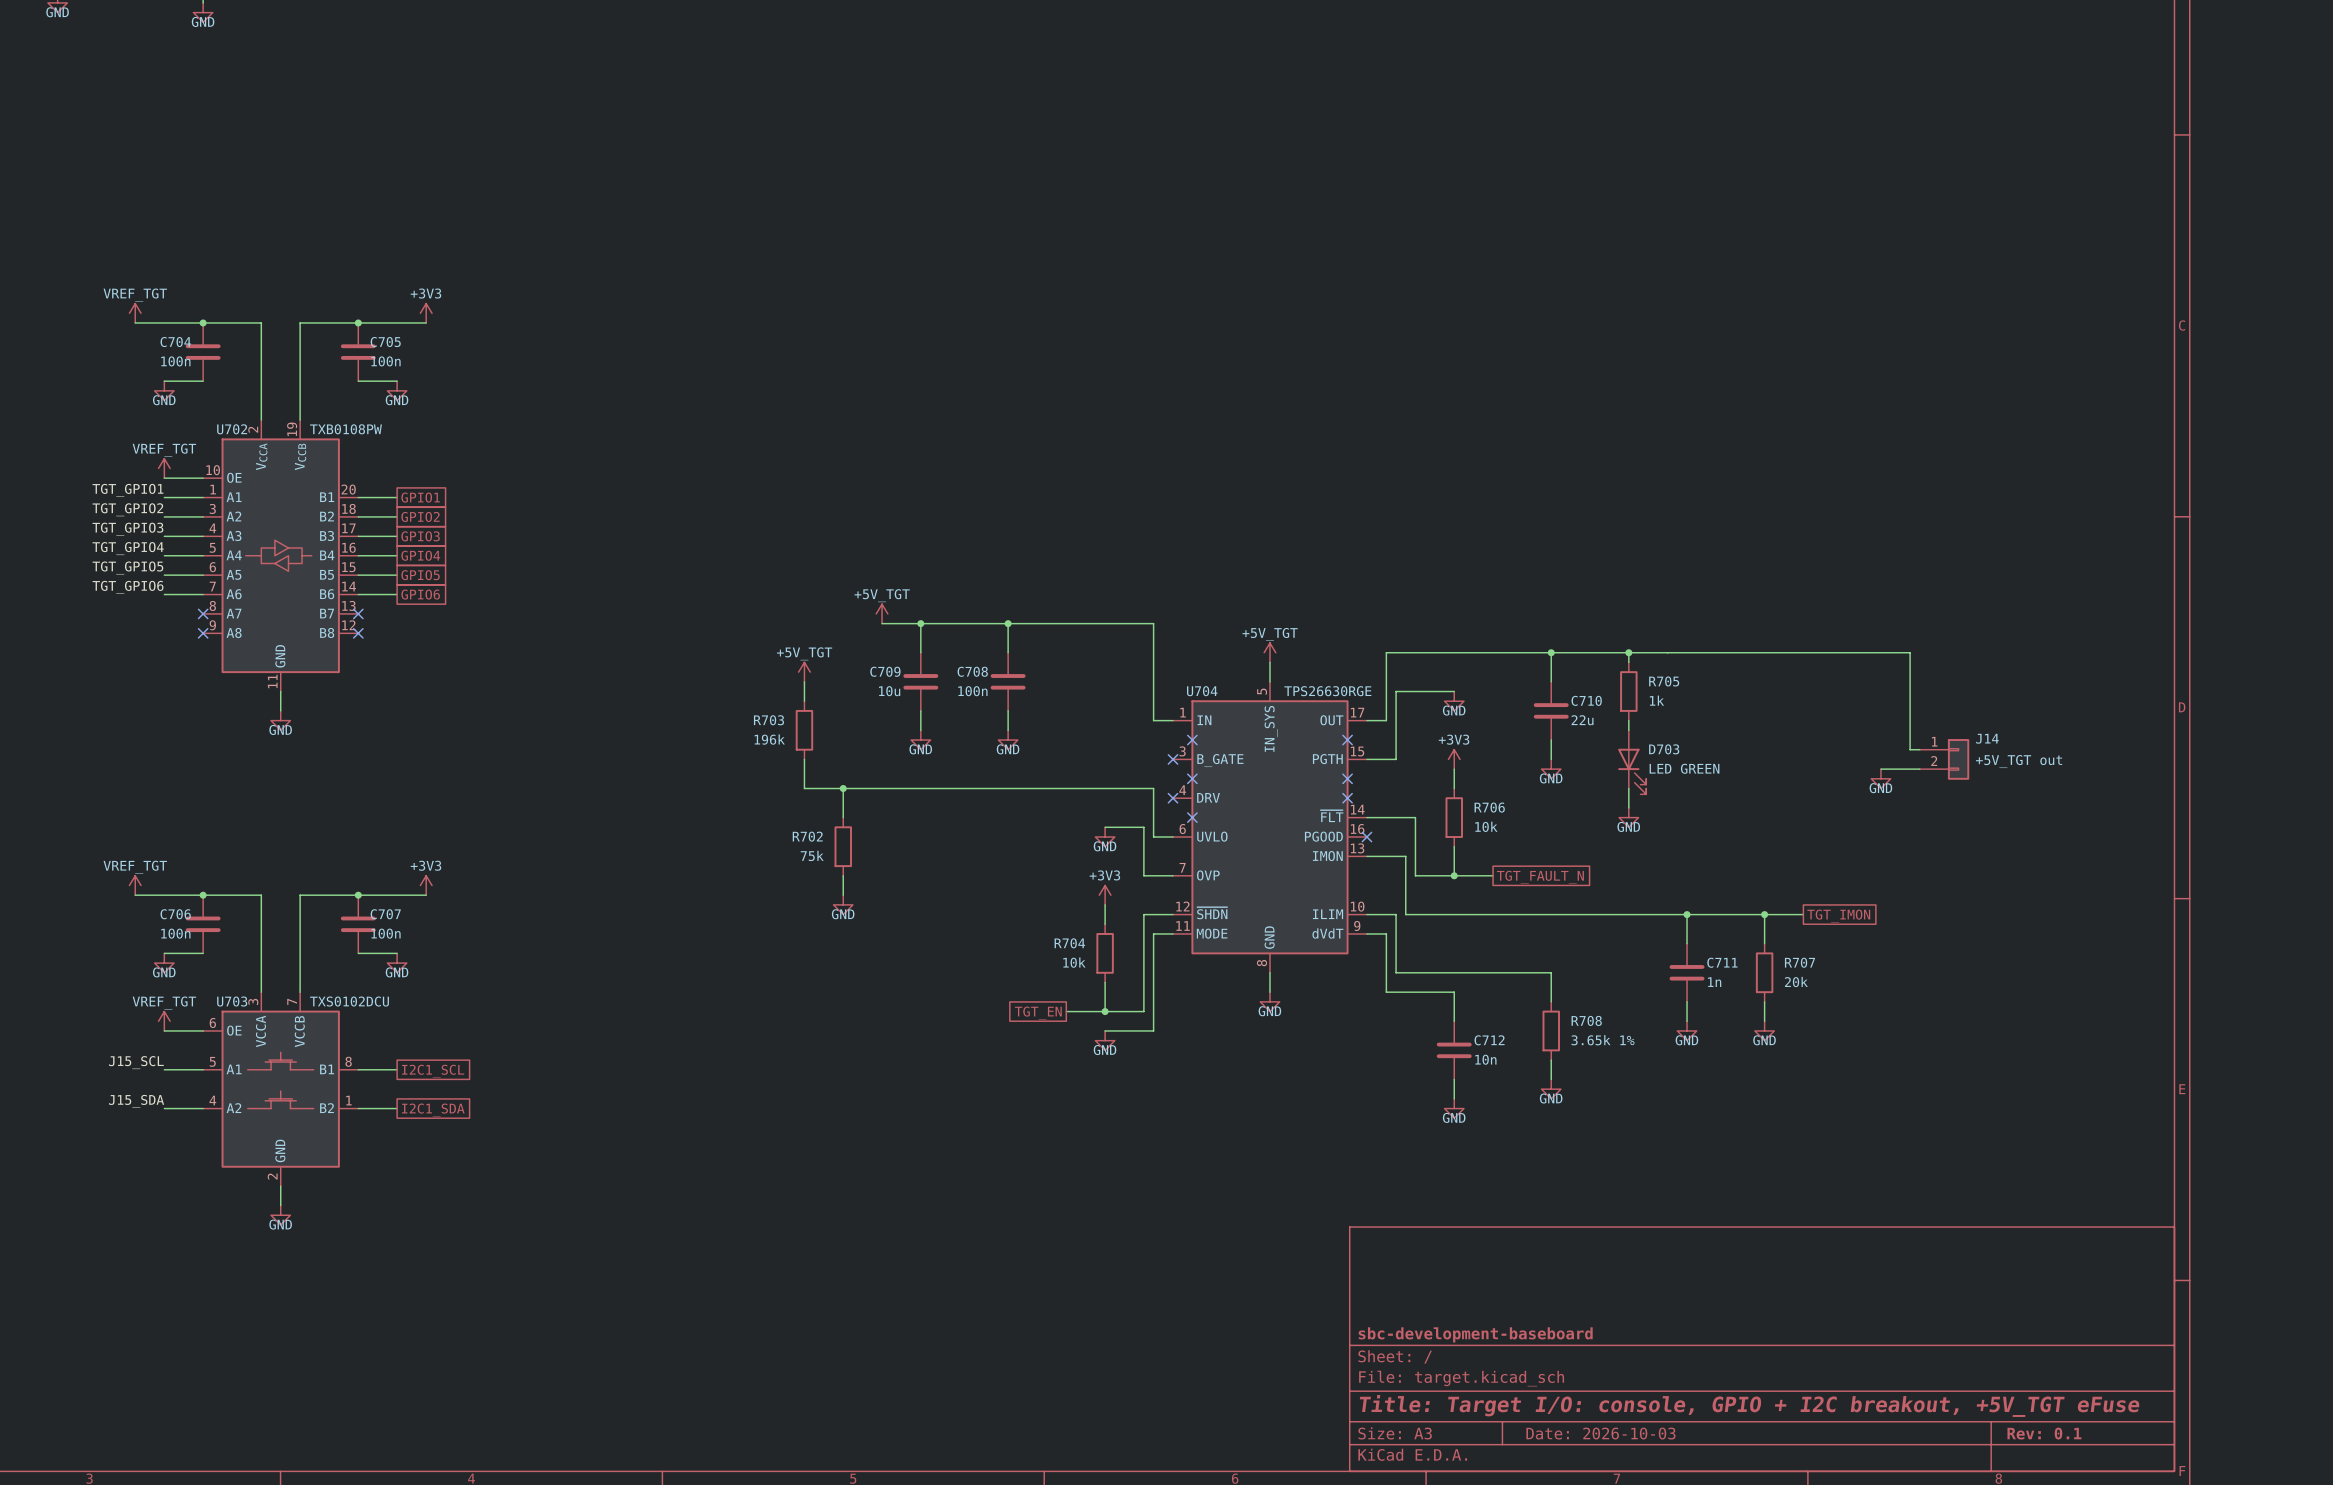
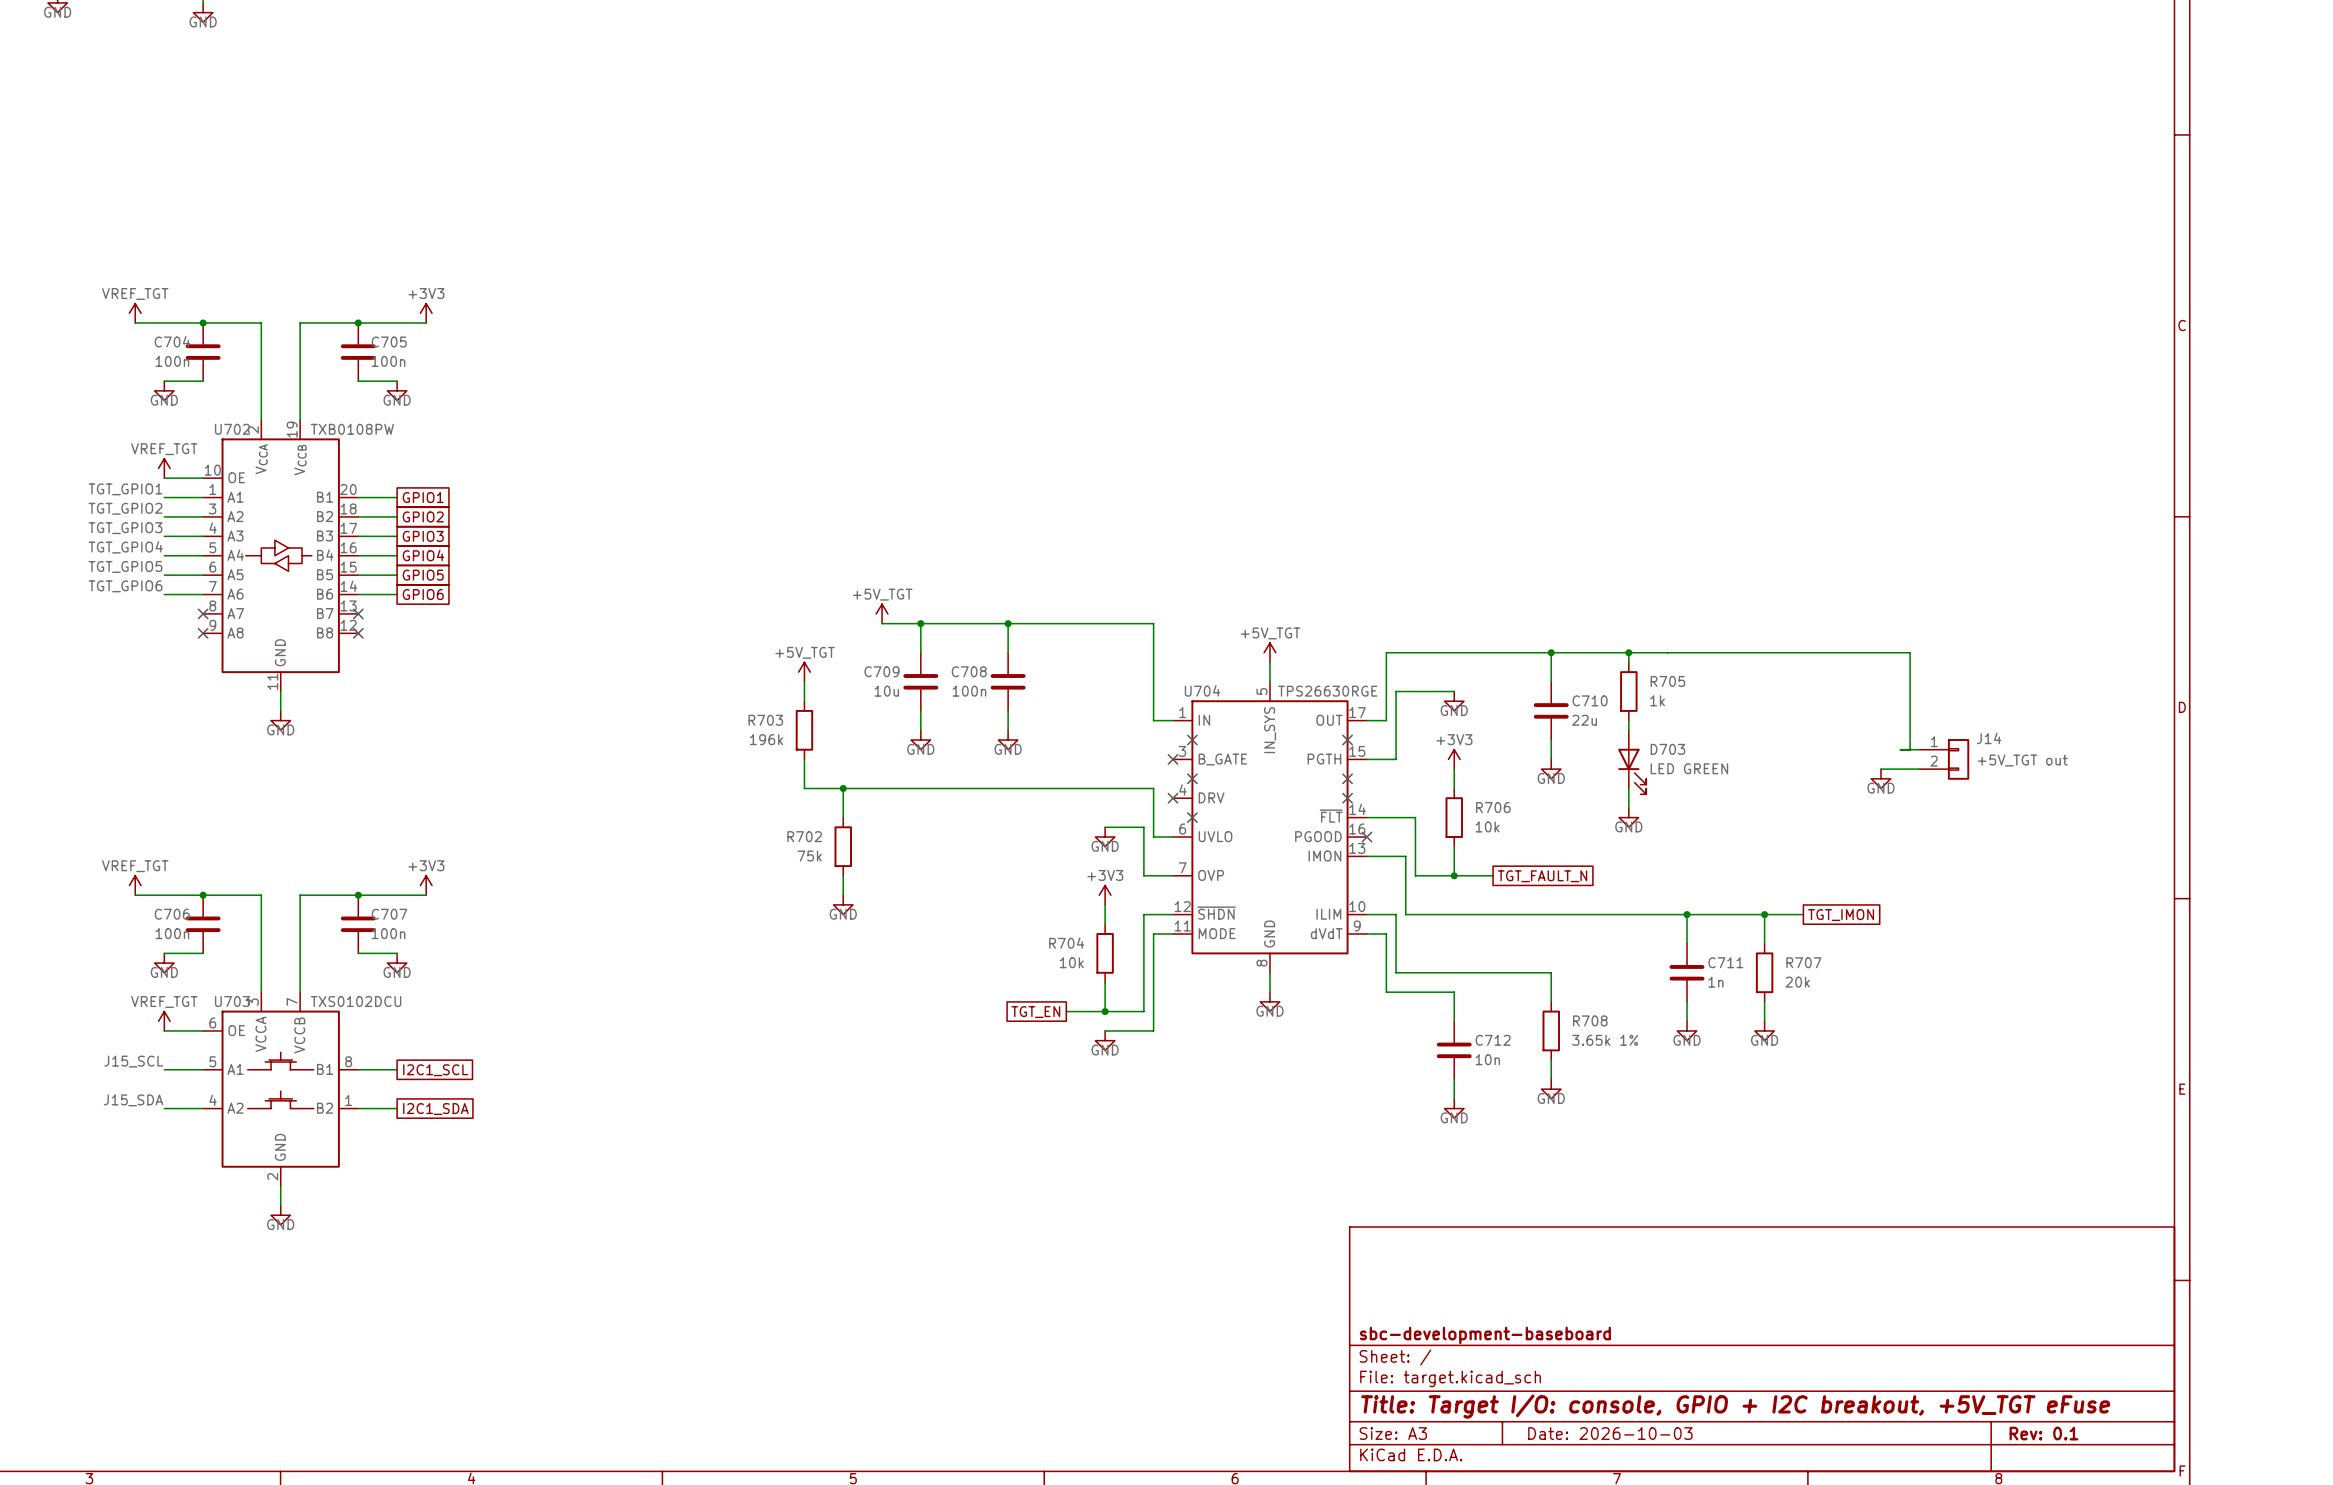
wire: none -> (1900, 749) (1910, 749)

